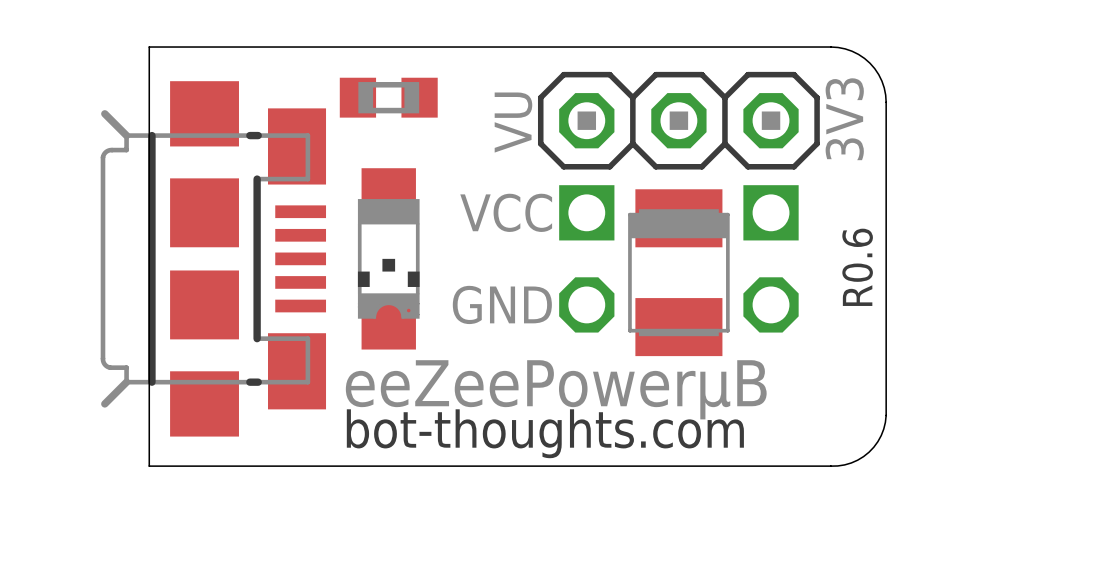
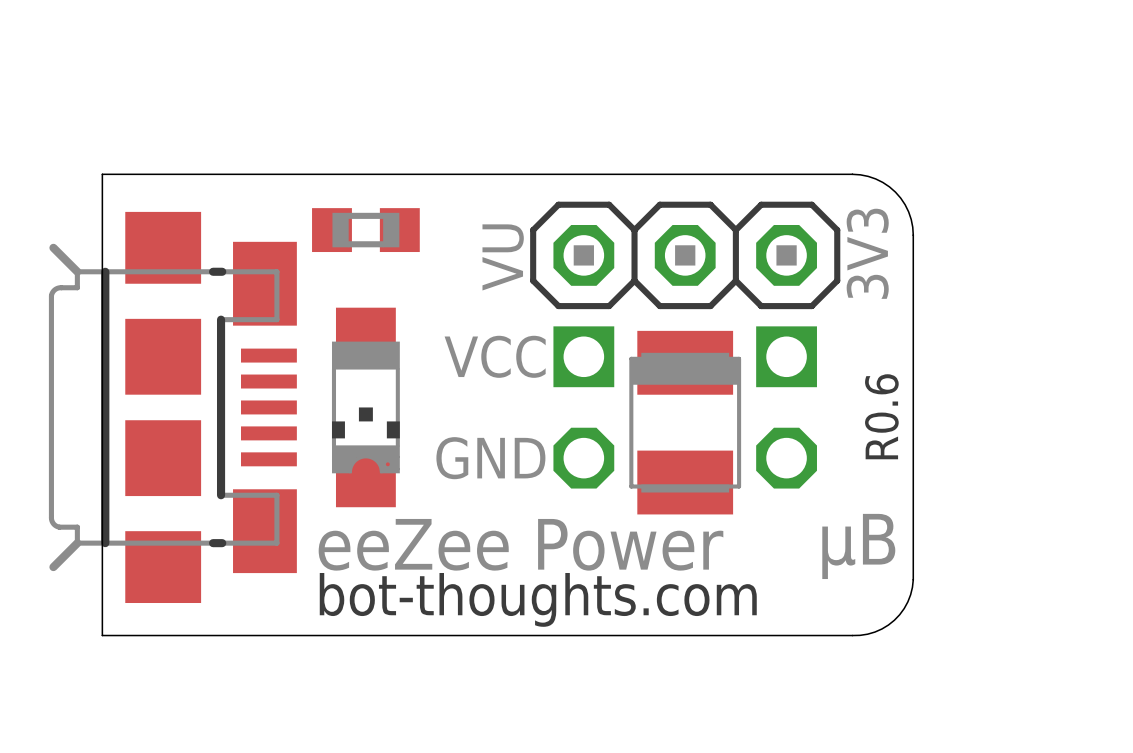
text: none -> μB (858, 546)
text: eeZeePowerμB (556, 389) -> eeZee Power (521, 544)

